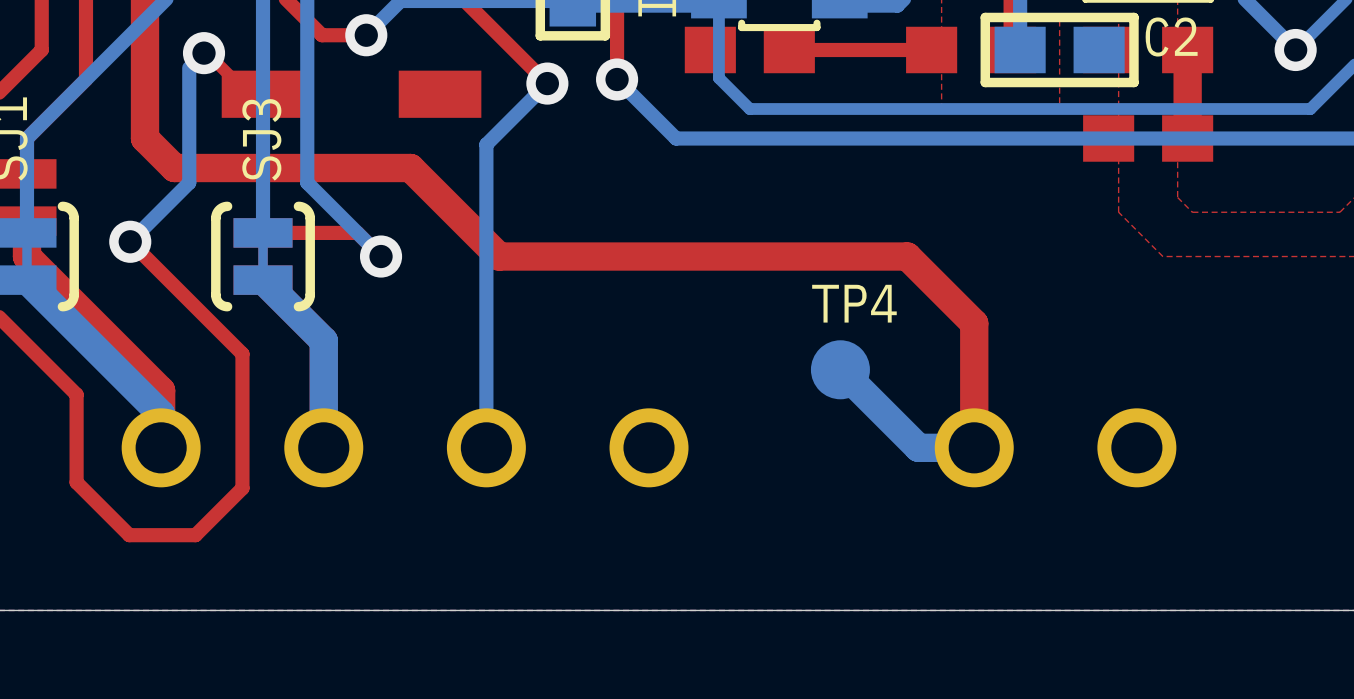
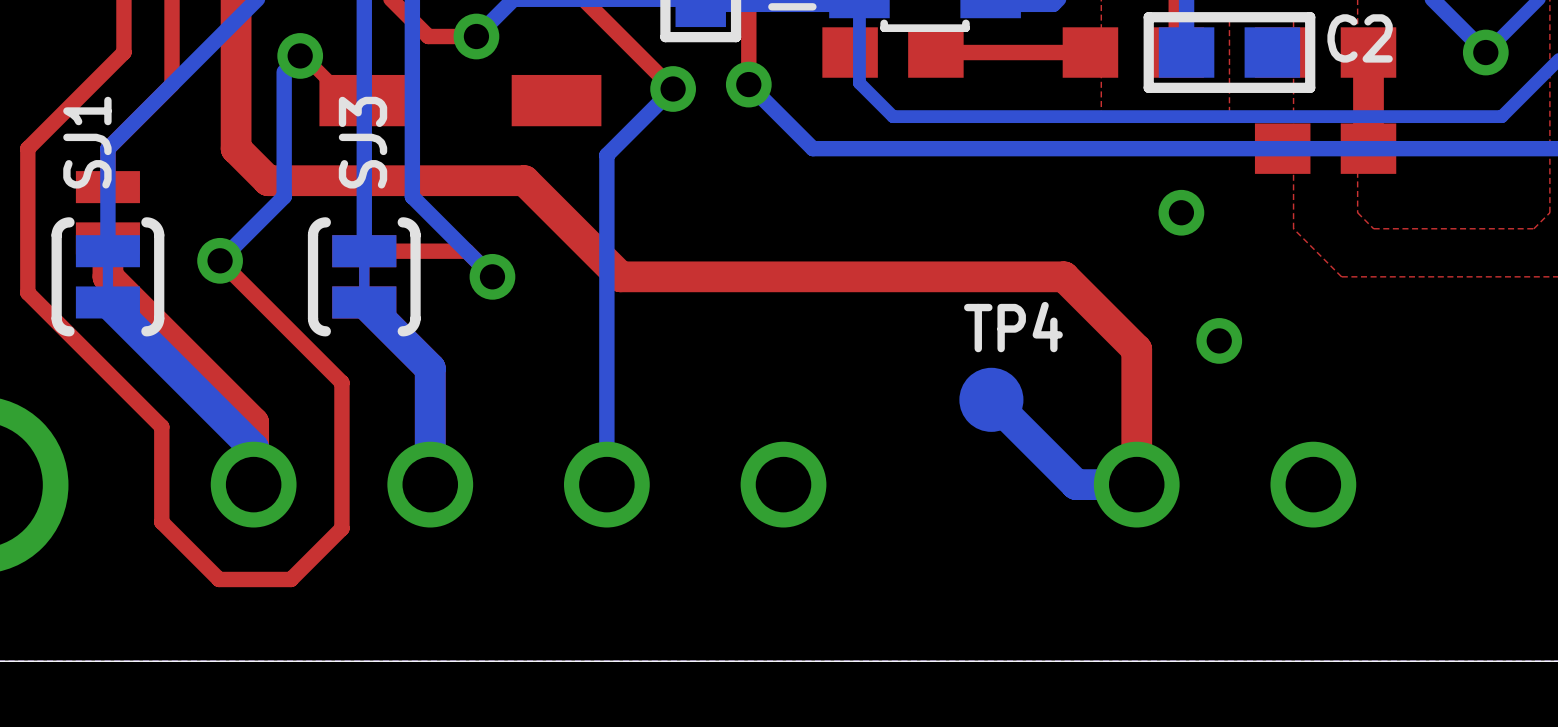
via: none -> (1181, 212)
via: none -> (1219, 340)

